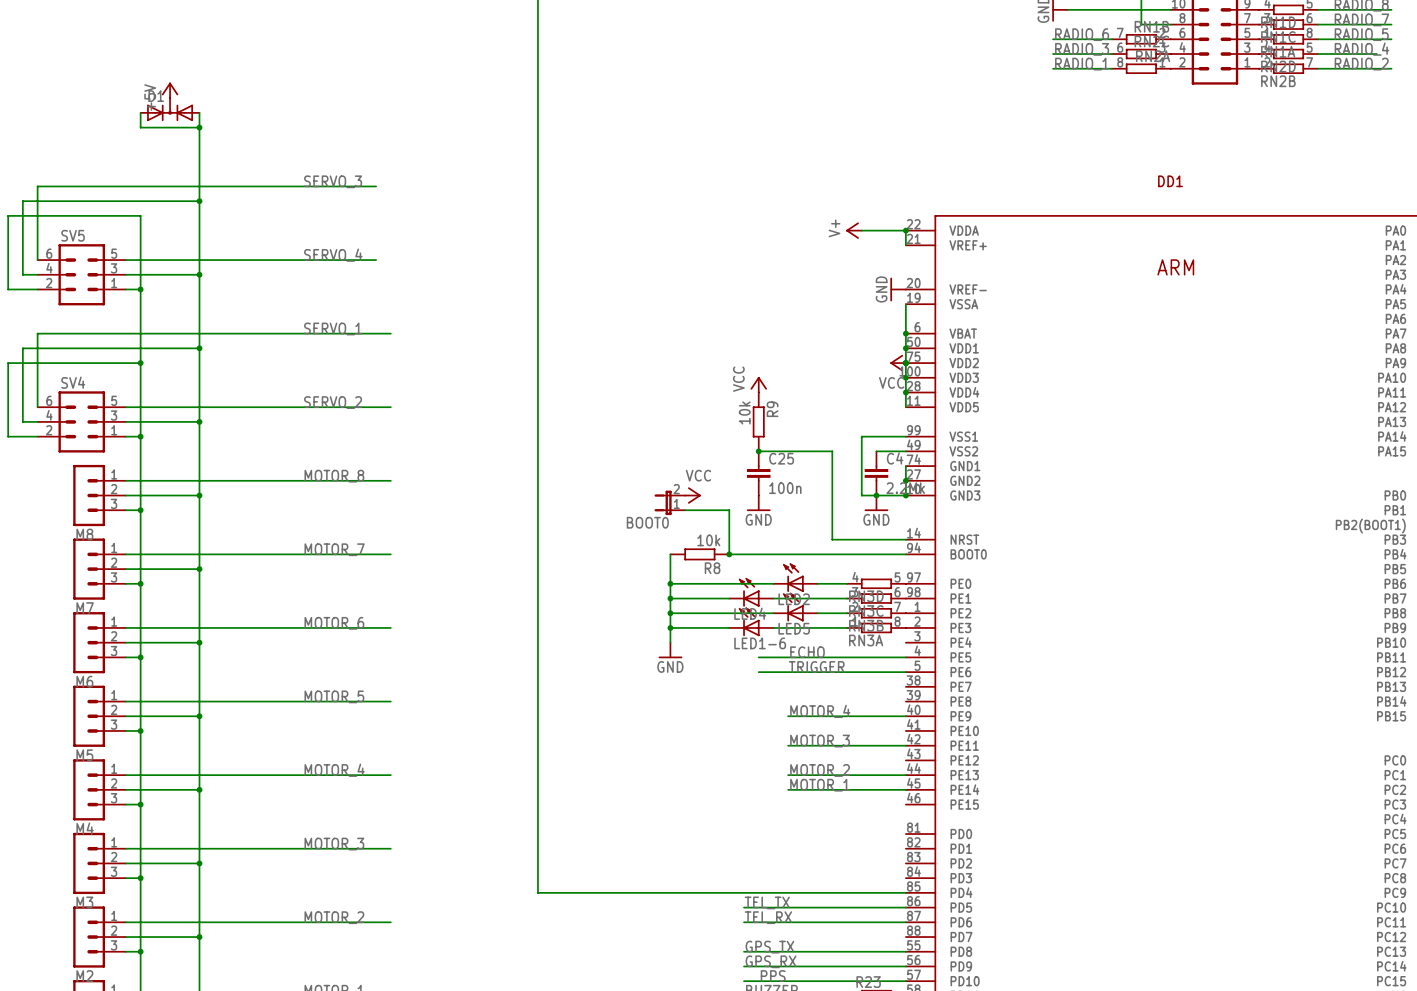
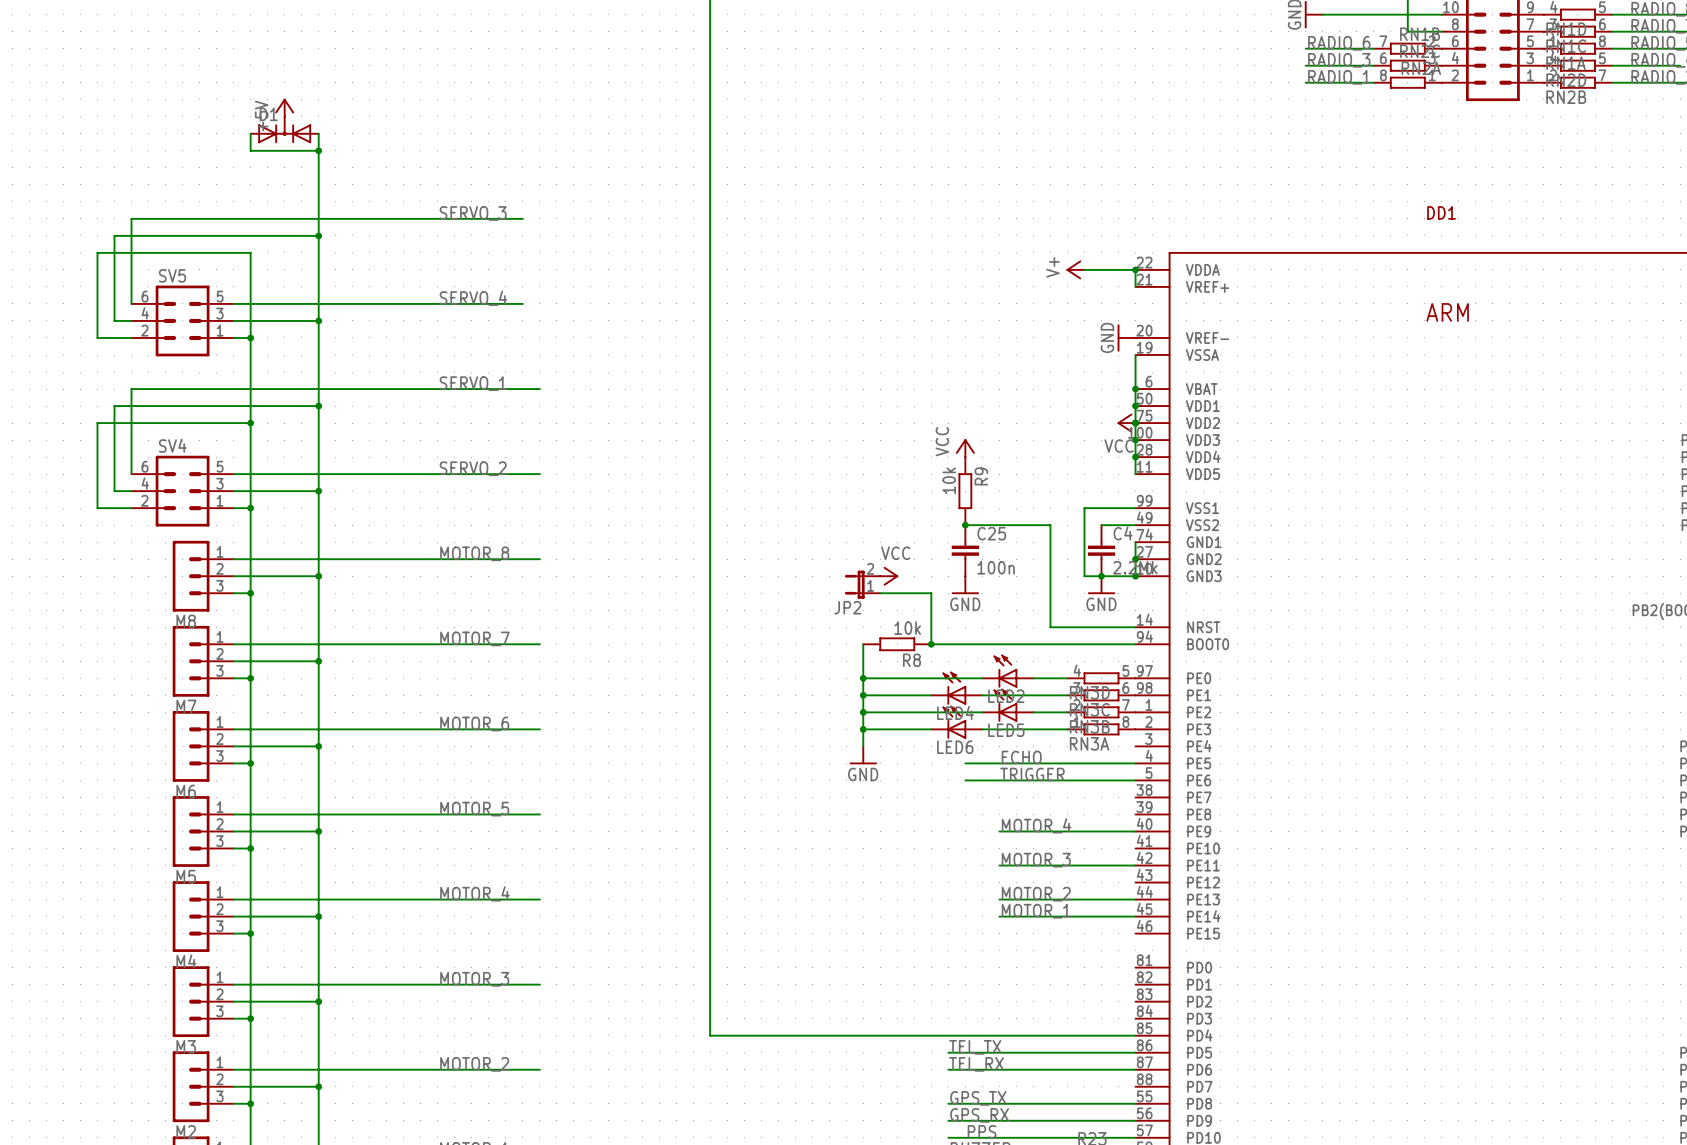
BOOT0 name: BOOT0 (647, 522) -> JP2 (847, 607)
LED1-6 name: LED1-6 (760, 643) -> LED6 (955, 747)

